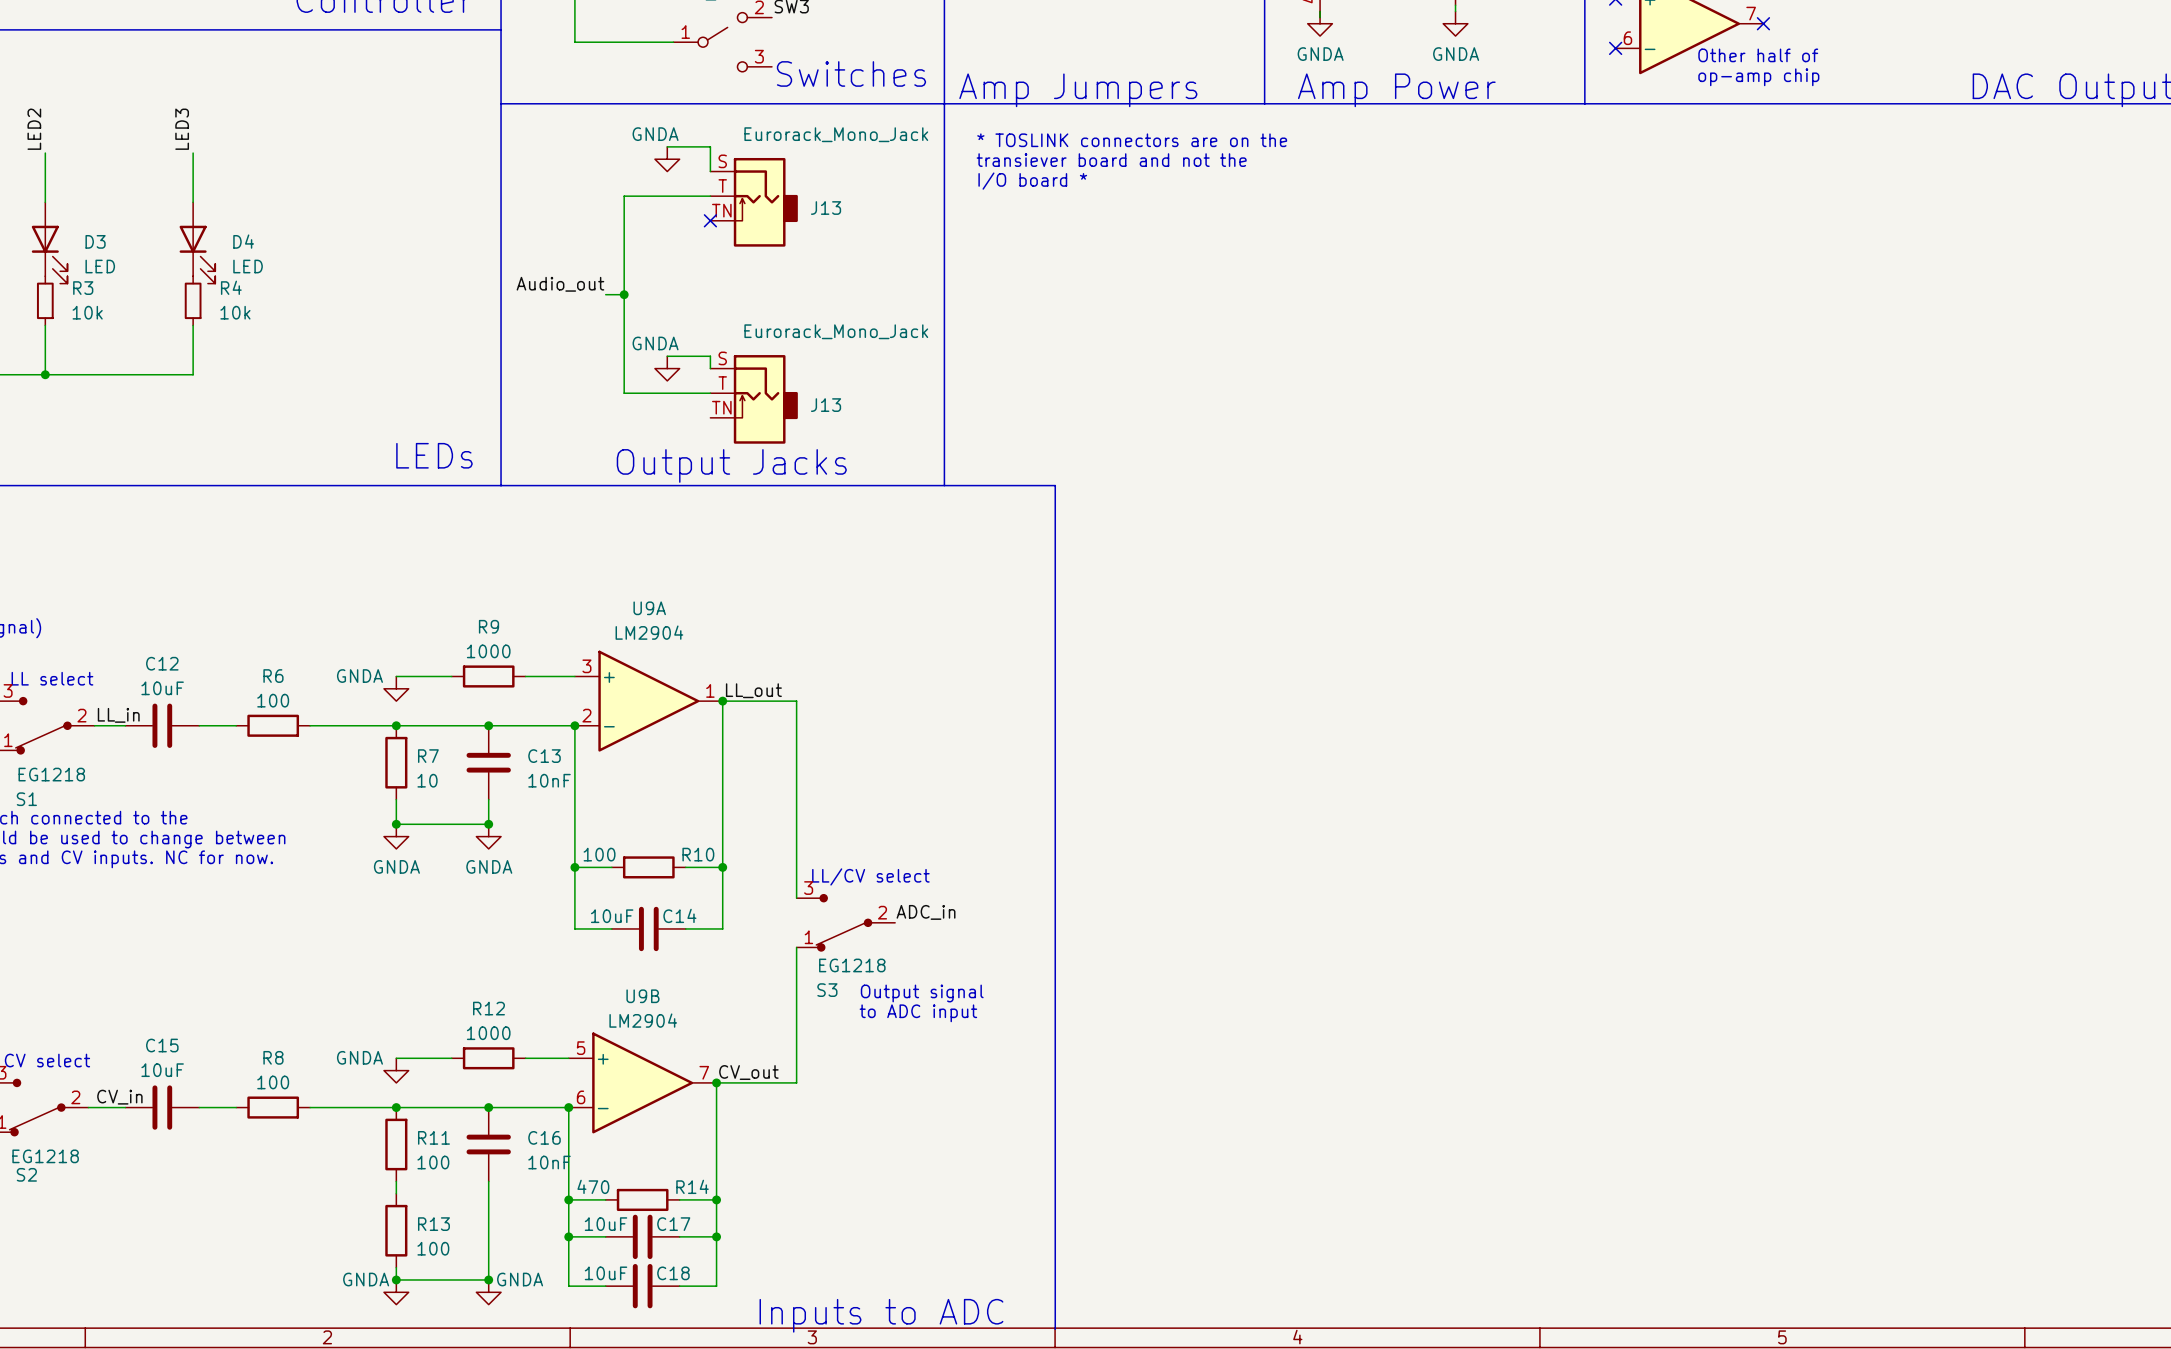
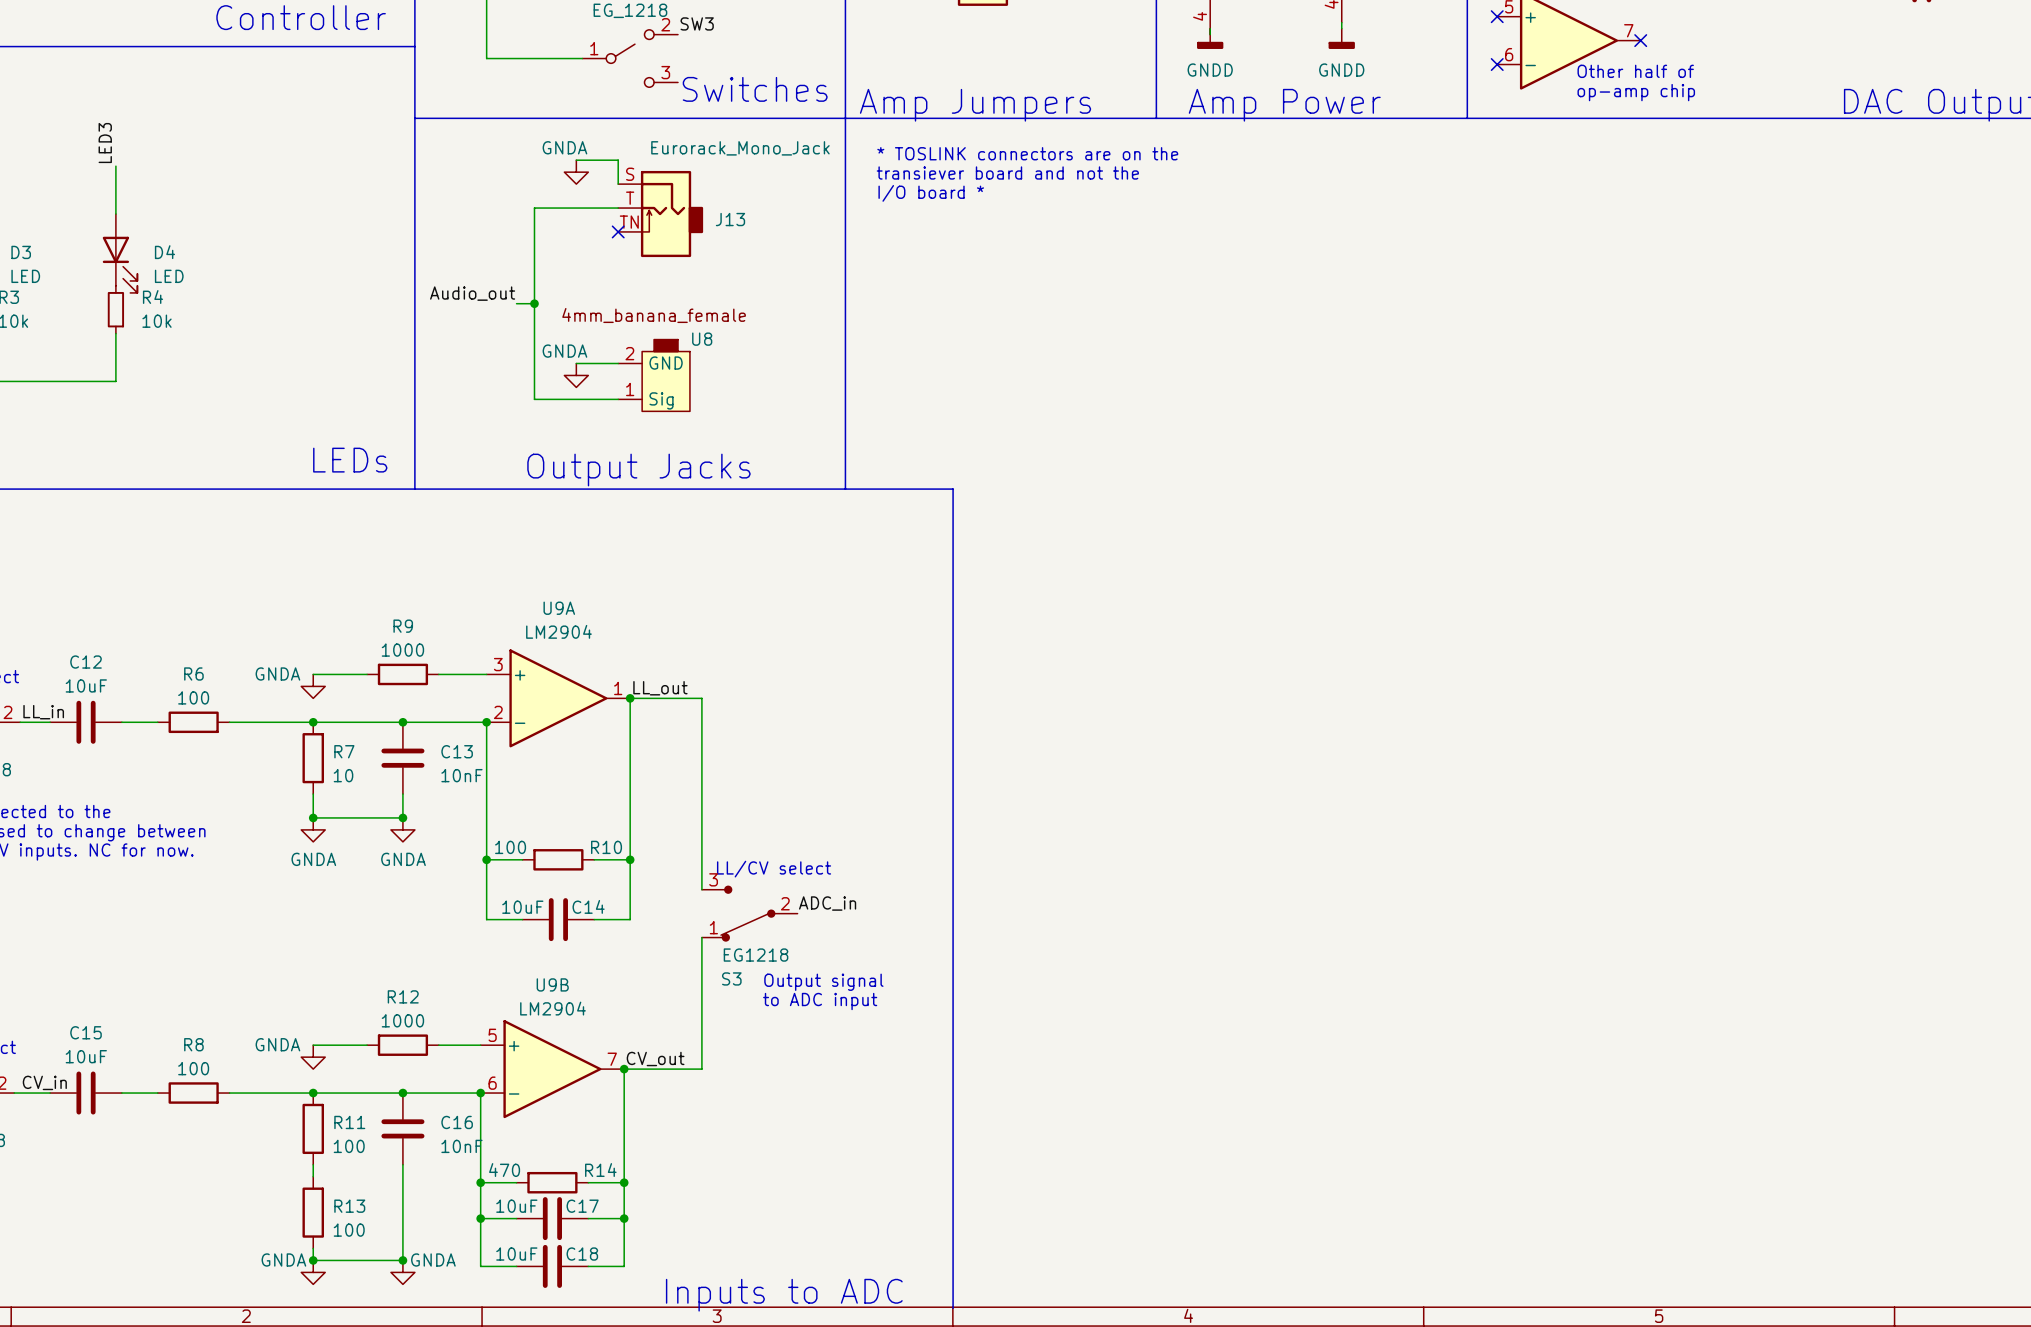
power symbol: GNDA (1320, 23) -> GNDD (1210, 38)
power symbol: GNDA (1455, 23) -> GNDD (1341, 38)
wire: (710, 356) (710, 368) -> none
U8: none -> (654, 375)
J13: Eurorack_Mono_Jack (754, 399) -> none

